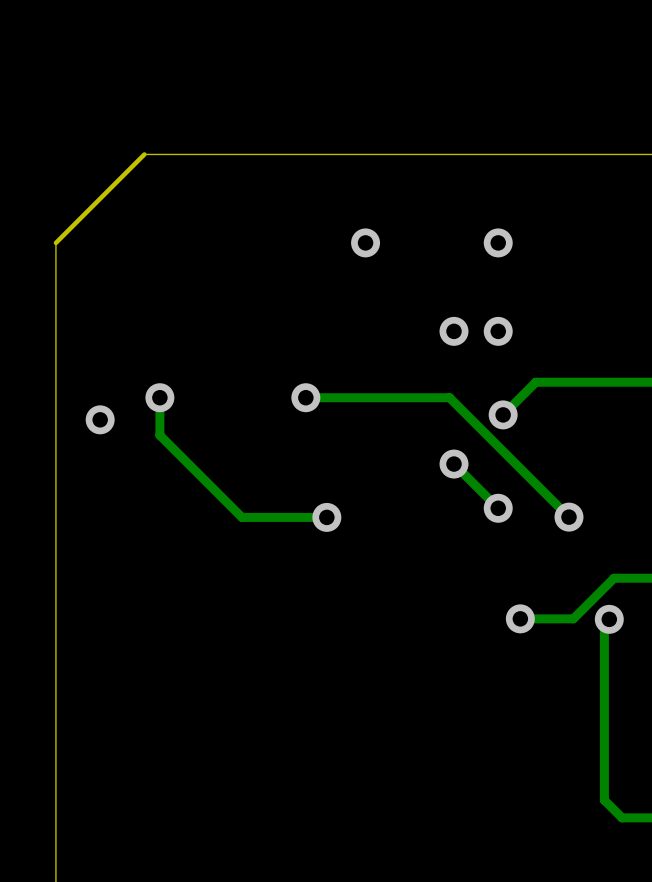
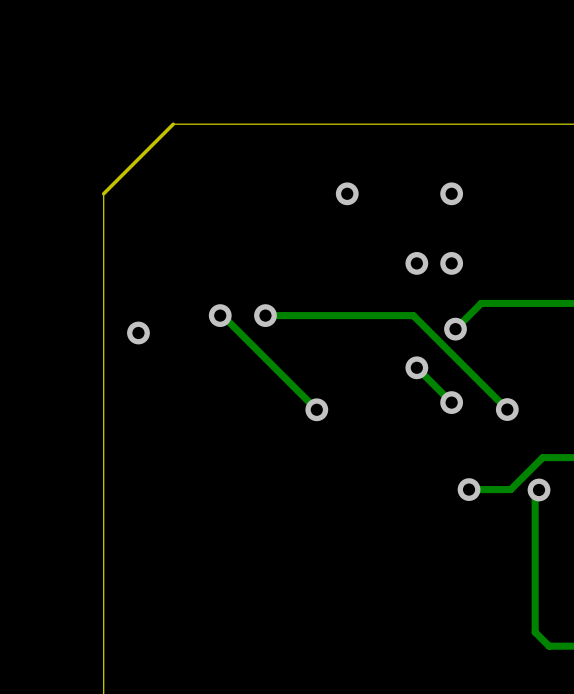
track: (159, 397) (159, 435) (241, 517) (326, 517) -> (220, 315) (222, 315) (316, 409)
via position: (159, 397) -> (220, 315)
track: none -> (300, 315) (265, 315)
via position: (305, 397) -> (265, 315)

